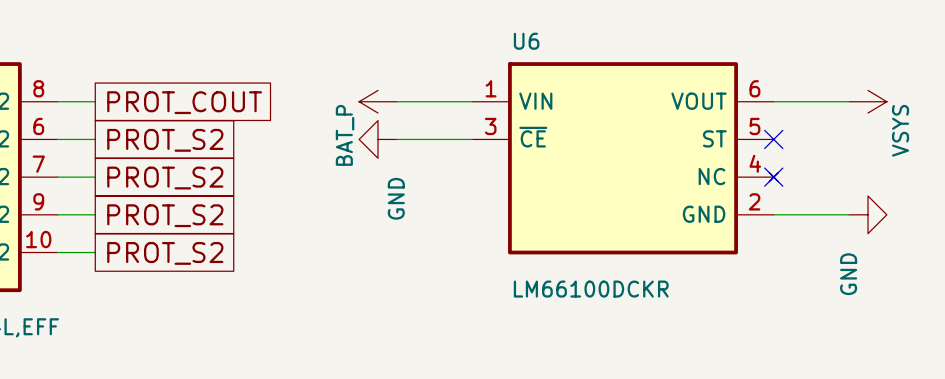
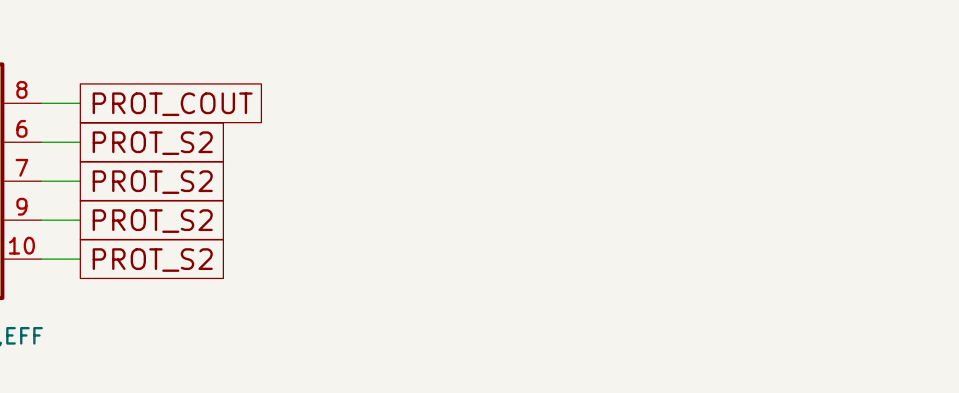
power symbol: BAT_P (377, 101) -> none
wire: (396, 101) (472, 101) -> none
wire: (773, 101) (849, 101) -> none
power symbol: VSYS (868, 101) -> none
power symbol: GND (377, 139) -> none
wire: (396, 139) (472, 139) -> none
no-connect mark: (773, 139) -> none
U6: LM66100DCKR (625, 158) -> none
no-connect mark: (773, 177) -> none
wire: (773, 214) (849, 214) -> none
power symbol: GND (868, 214) -> none

